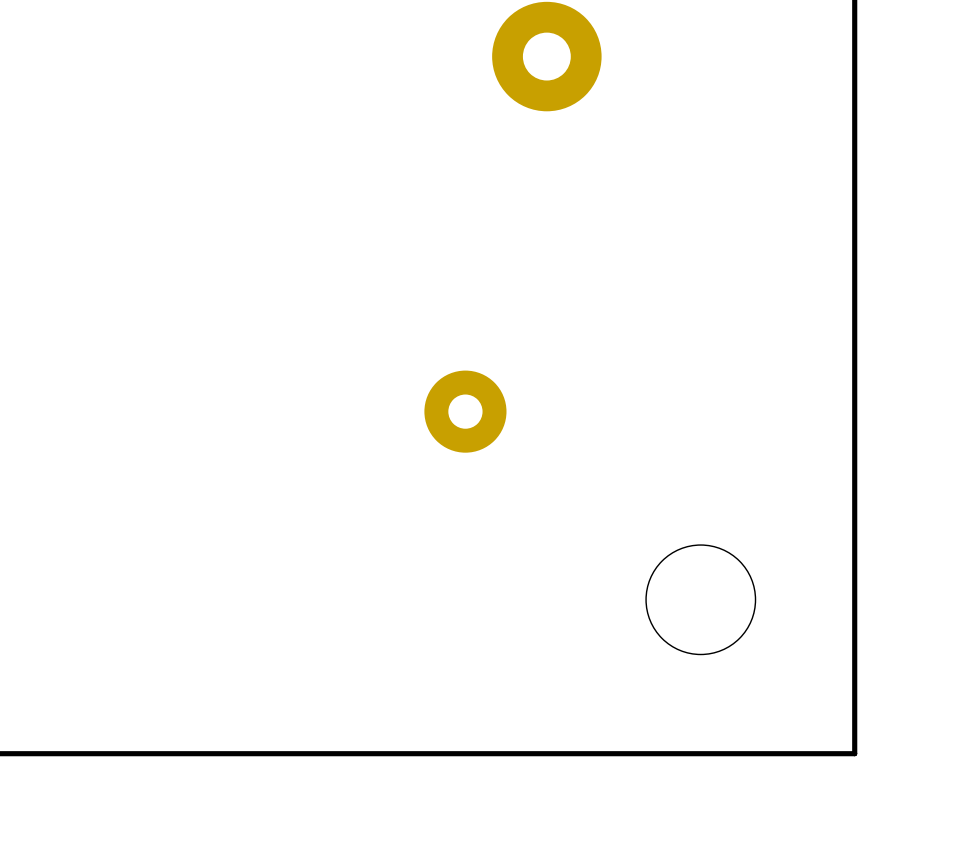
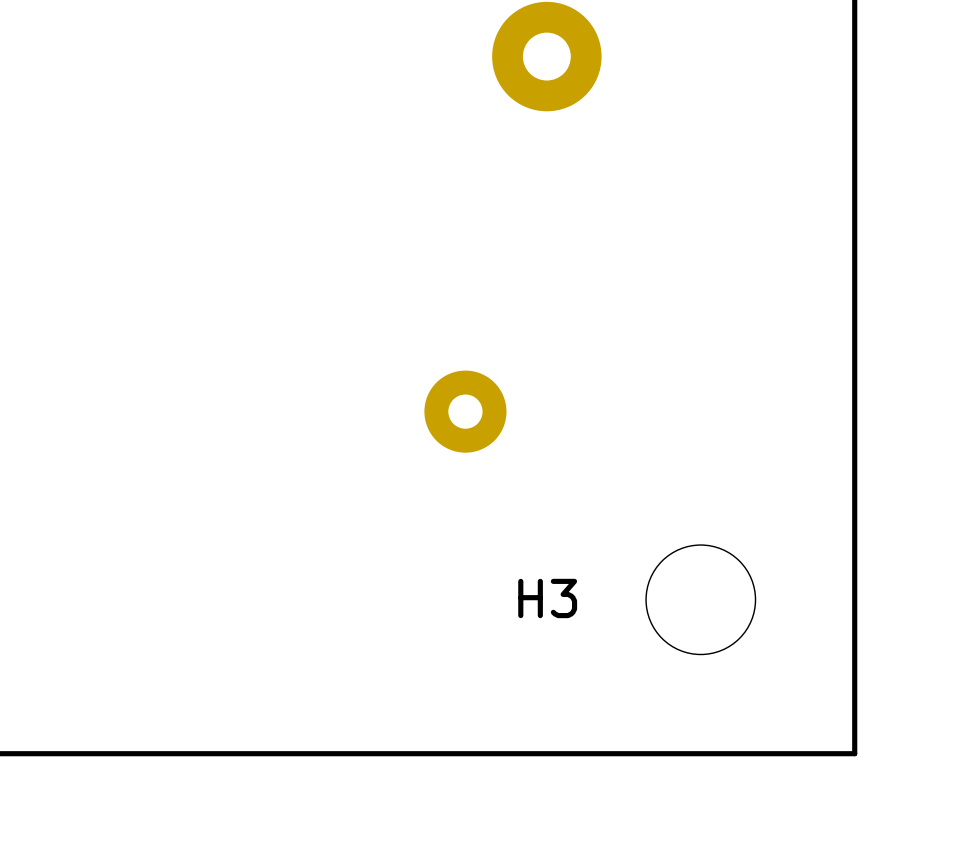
H3 name: none -> H3 (547, 598)

